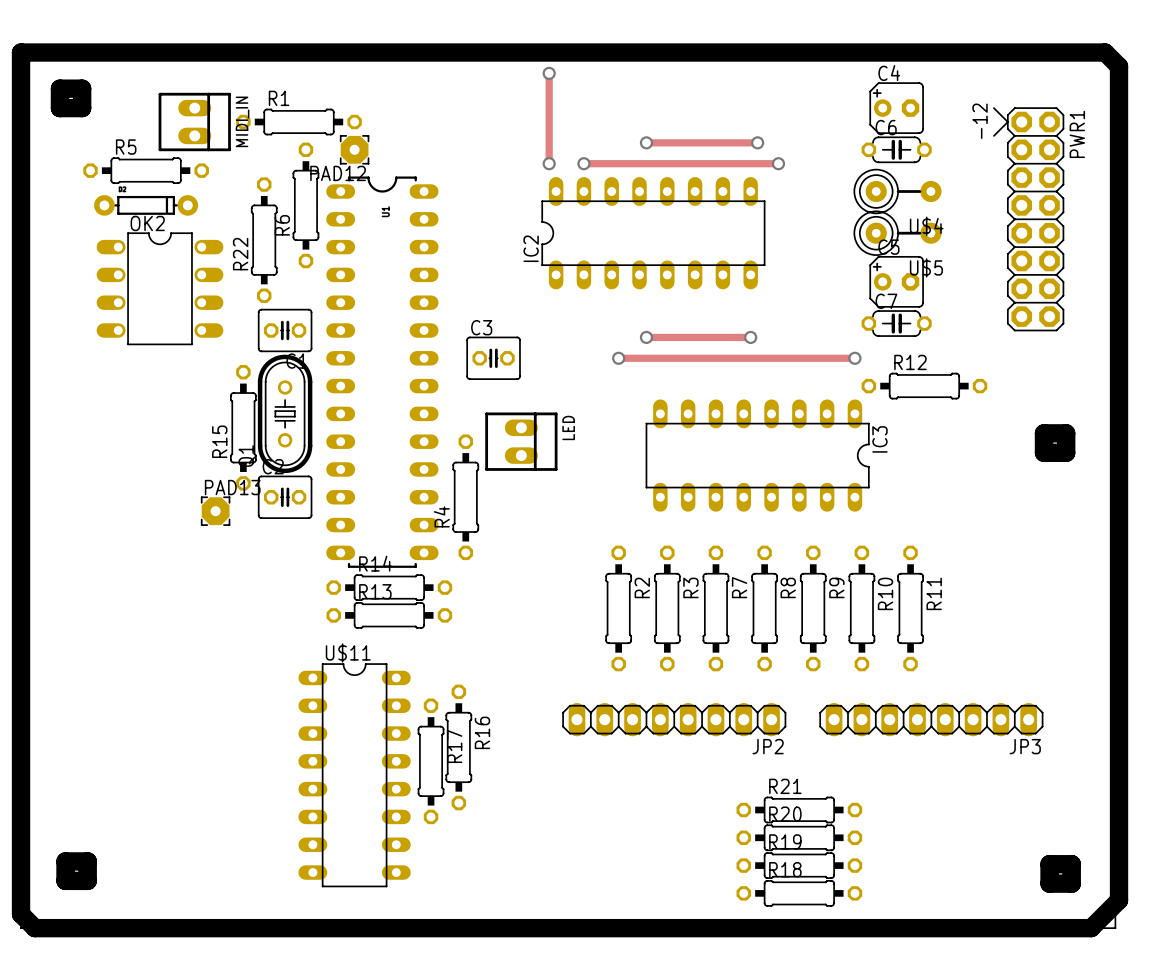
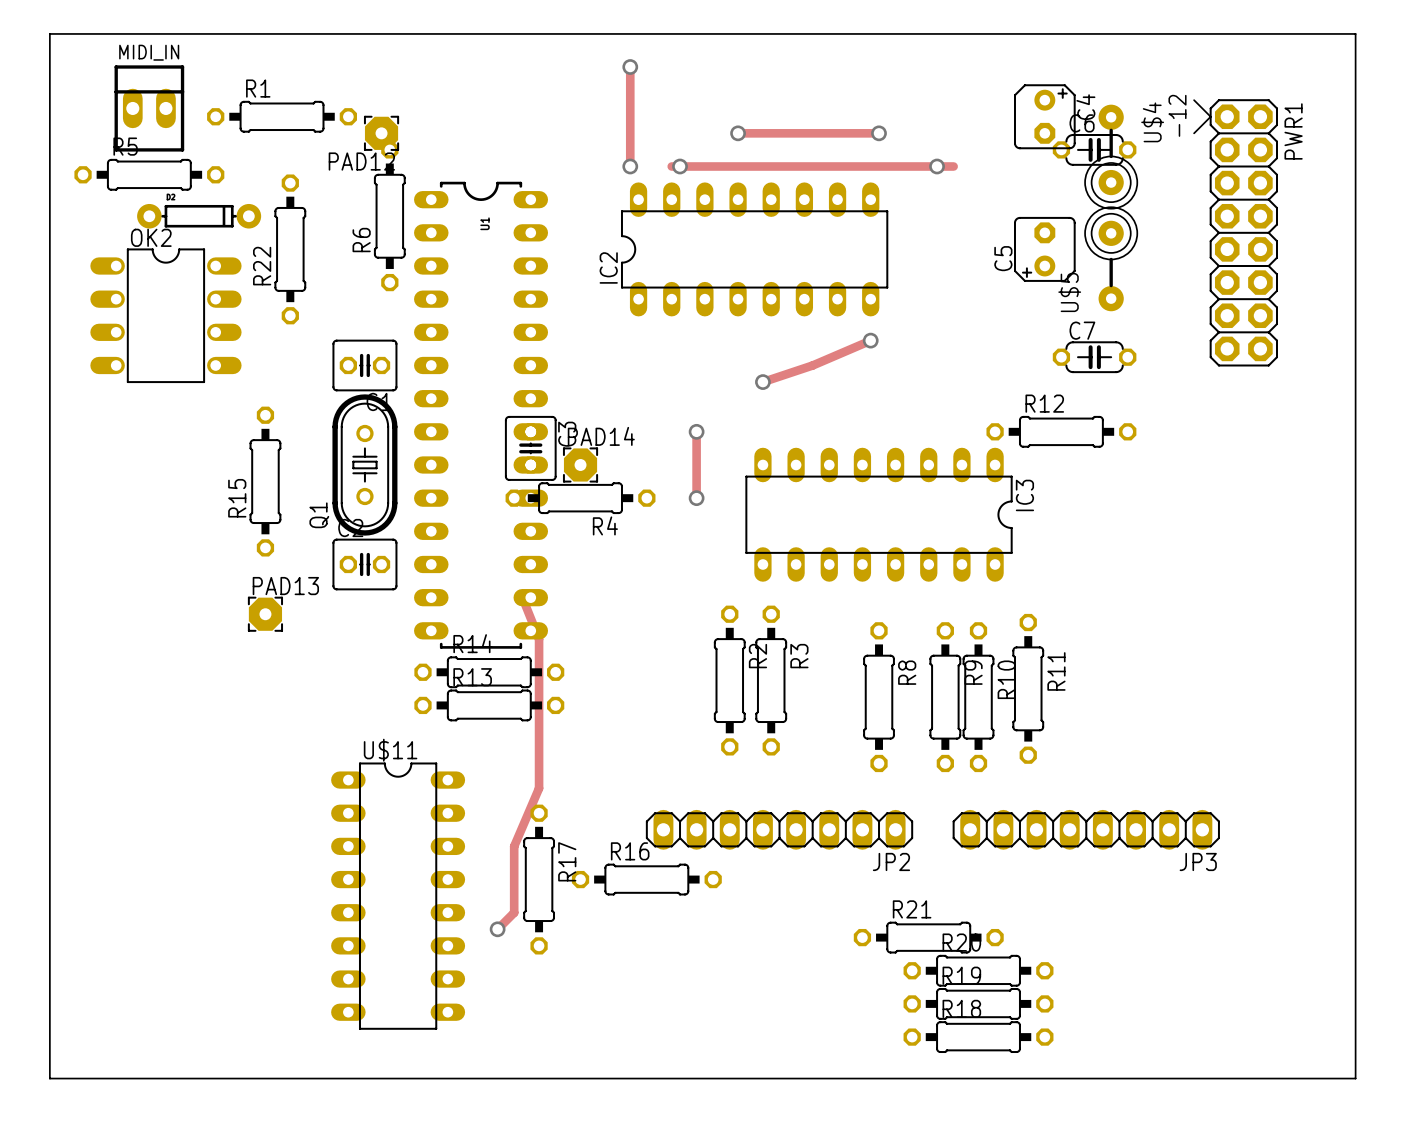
board edge: (21, 52) (21, 914) (34, 928) (1091, 928) (1119, 900) (1119, 66) (1105, 52) (21, 52) -> none
track: (549, 73) (549, 163) -> none
via: (549, 73) -> none
track: none -> (630, 67) (630, 166)
via: none -> (630, 67)
board edge: (59, 88) (82, 88) (82, 108) (59, 108) (59, 88) -> none
C4 rotation: 0° (896, 108) -> 90° clockwise (1044, 116)
C4 position: (896, 108) -> (1044, 116)
MIDI_IN rotation: 0° (194, 122) -> 90° counterclockwise (149, 108)
MIDI_IN position: (194, 122) -> (149, 108)
R1 position: (298, 122) -> (282, 116)
track: none -> (738, 133) (879, 133)
via: none -> (738, 133)
via: none -> (879, 133)
track: (646, 142) (757, 142) -> none
via: (646, 142) -> none
via: (757, 142) -> none
PAD12 position: (354, 149) -> (381, 133)
via: none -> (630, 166)
track: none -> (671, 166) (721, 166)
via: (583, 163) -> none
via: none -> (937, 166)
via: (778, 163) -> none
R5 position: (146, 170) -> (149, 174)
U$4 rotation: 0° (897, 191) -> 90° counterclockwise (1111, 157)
PWR1 position: (1028, 219) -> (1235, 232)
IC2 position: (653, 233) -> (754, 249)
U$5 rotation: 0° (897, 233) -> 90° clockwise (1111, 258)
R22 position: (264, 240) -> (290, 249)
C5 rotation: 0° (896, 281) -> 90° counterclockwise (1044, 249)
C5 position: (896, 281) -> (1044, 249)
OK2 position: (160, 288) -> (165, 315)
track: none -> (870, 340) (812, 365) (762, 382)
via: none -> (870, 340)
track: (646, 337) (750, 337) -> none
via: (646, 337) -> none
via: (750, 337) -> none
C3 rotation: 0° (493, 358) -> 90° clockwise (530, 448)
C3 position: (493, 358) -> (530, 448)
track: (618, 358) (854, 358) -> none
via position: (618, 358) -> (762, 382)
via: (854, 358) -> none
track: none -> (696, 431) (696, 498)
via: none -> (696, 431)
R12 position: (924, 386) -> (1061, 431)
PAD14: none -> (580, 464)
R15 position: (243, 427) -> (265, 481)
board edge: (1043, 433) (1066, 433) (1066, 452) (1043, 452) (1043, 433) -> none
LED: (521, 441) -> none
via: none -> (696, 498)
IC3 position: (757, 455) -> (879, 514)
R4 rotation: 0° (465, 497) -> 90° clockwise (580, 498)
PAD13 position: (215, 511) -> (265, 614)
R4 name position: R4 (441, 516) -> R4 (605, 525)
track: none -> (522, 597) (539, 639) (539, 788) (514, 846) (514, 912) (497, 929)
R7 name: R7 (739, 587) -> R8 (907, 672)
R2 position: (618, 608) -> (729, 680)
R3 position: (667, 608) -> (771, 680)
R8: (764, 608) -> none
R9 position: (813, 608) -> (945, 697)
R10 position: (861, 608) -> (978, 697)
R11 position: (910, 608) -> (1028, 688)
JP2 position: (674, 719) -> (779, 829)
JP3 position: (931, 719) -> (1086, 829)
R16 name position: R16 (482, 732) -> R16 (630, 851)
R16 rotation: 0° (458, 747) -> 90° clockwise (646, 879)
U$11 position: (354, 775) -> (398, 896)
via: none -> (497, 929)
R21 position: (799, 809) -> (928, 937)
board edge: (65, 861) (87, 861) (87, 880) (65, 880) (65, 861) -> none
board edge: (1049, 864) (1071, 864) (1071, 883) (1049, 883) (1049, 864) -> none

